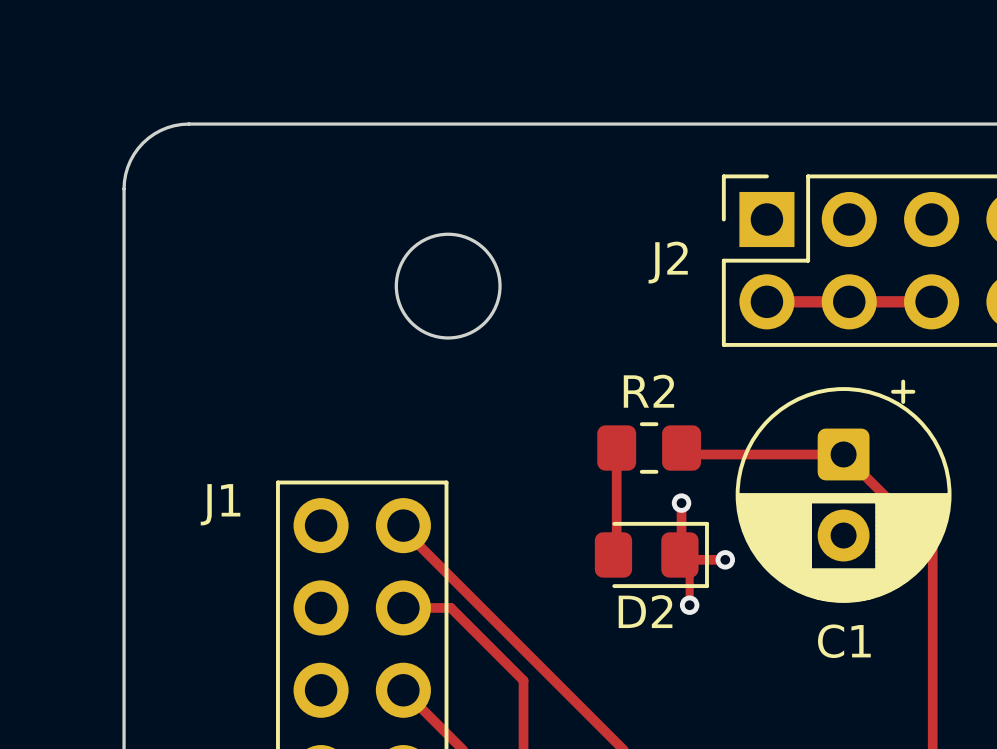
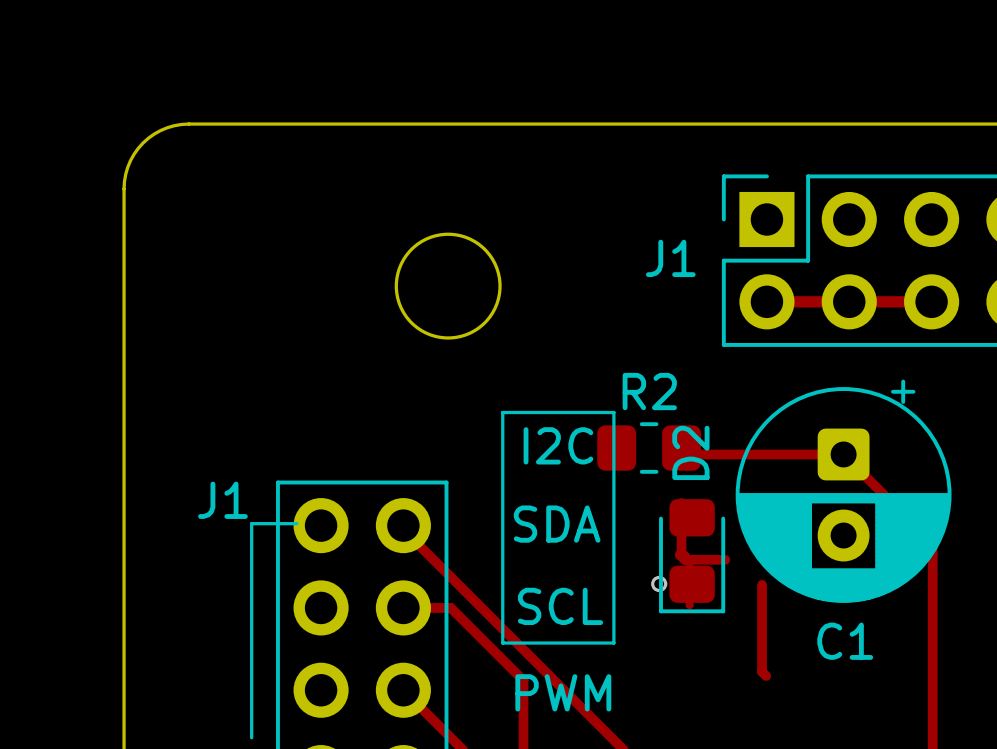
J2 name: J2 (668, 262) -> J1 (670, 258)
line: none -> (502, 412) (613, 412) (613, 643) (502, 643) (502, 412)
text: none -> I2C (558, 445)
track: (616, 448) (616, 551) (613, 554) -> none
via: (681, 503) -> none
line: none -> (296, 523) (251, 523) (251, 737)
text: none -> SDA (557, 524)
D2 rotation: 0° (651, 554) -> 90° clockwise (692, 556)
via: (725, 559) -> none
via: none -> (659, 583)
track: none -> (762, 584) (762, 671) (766, 675)
via: (689, 605) -> none
text: none -> SCL (560, 606)
D2 name position: D2 (645, 611) -> D2 (690, 452)
text: none -> PWM (563, 692)

